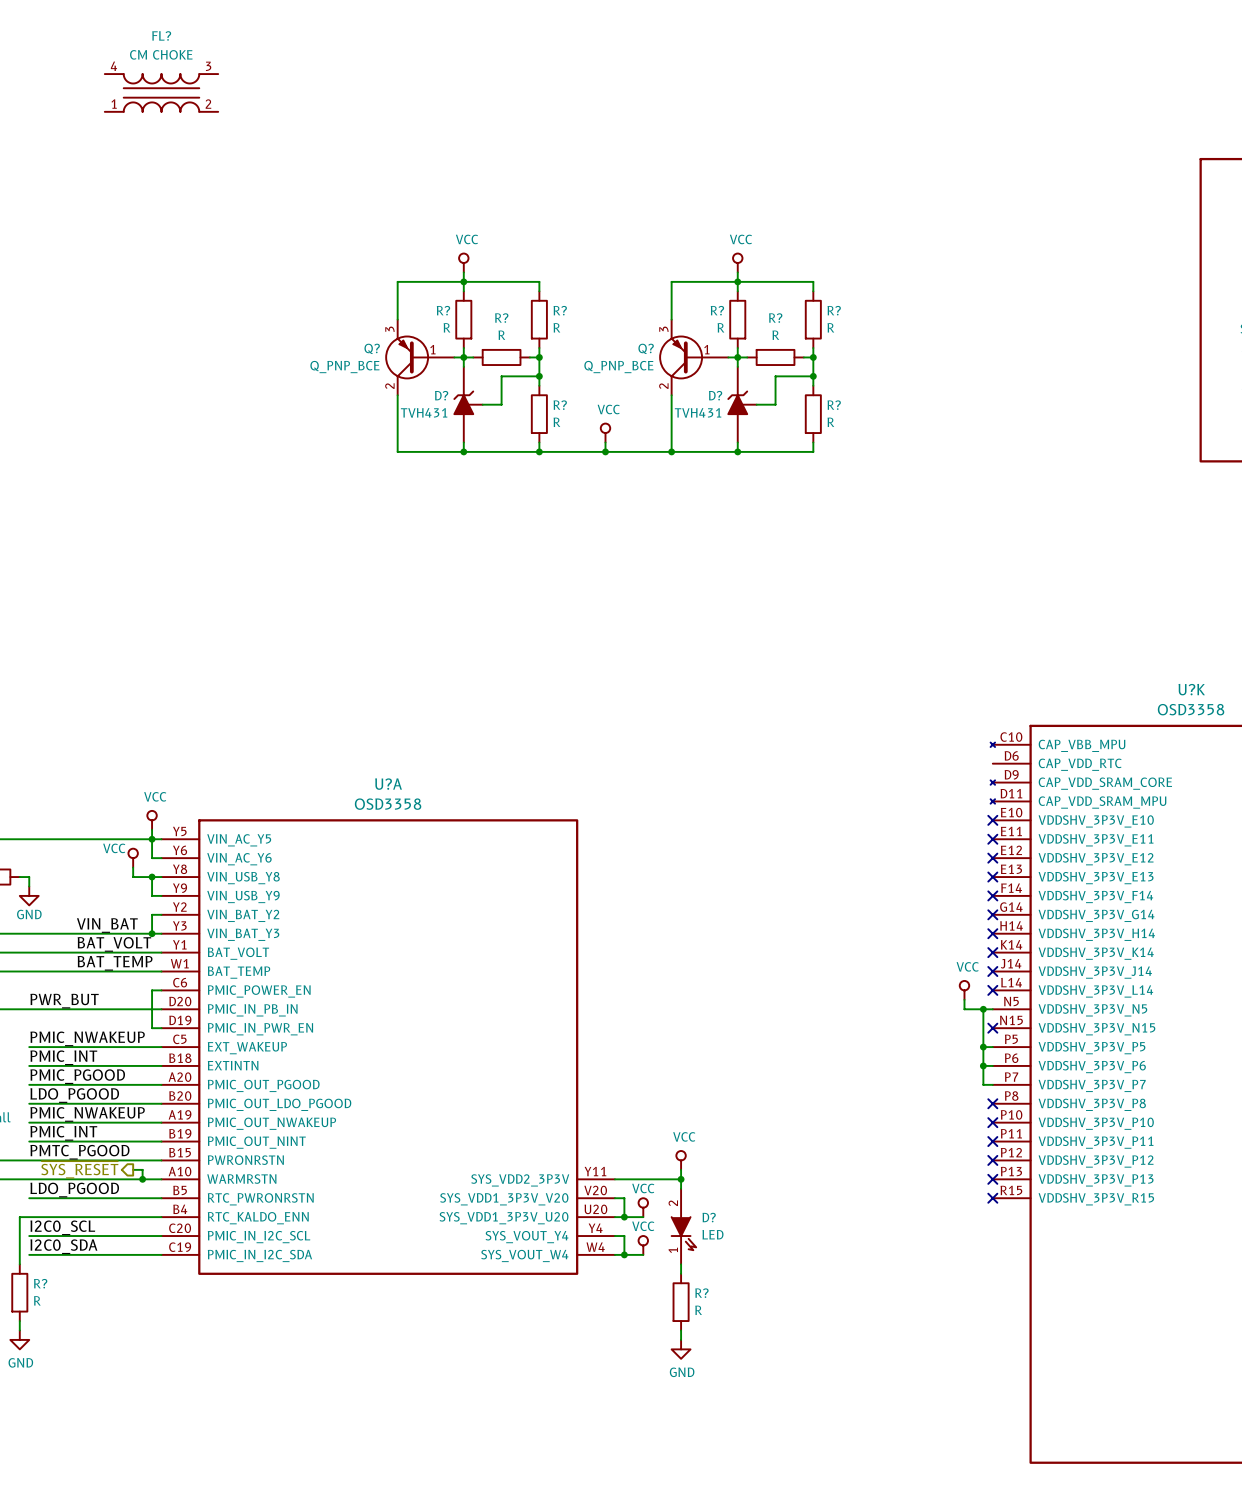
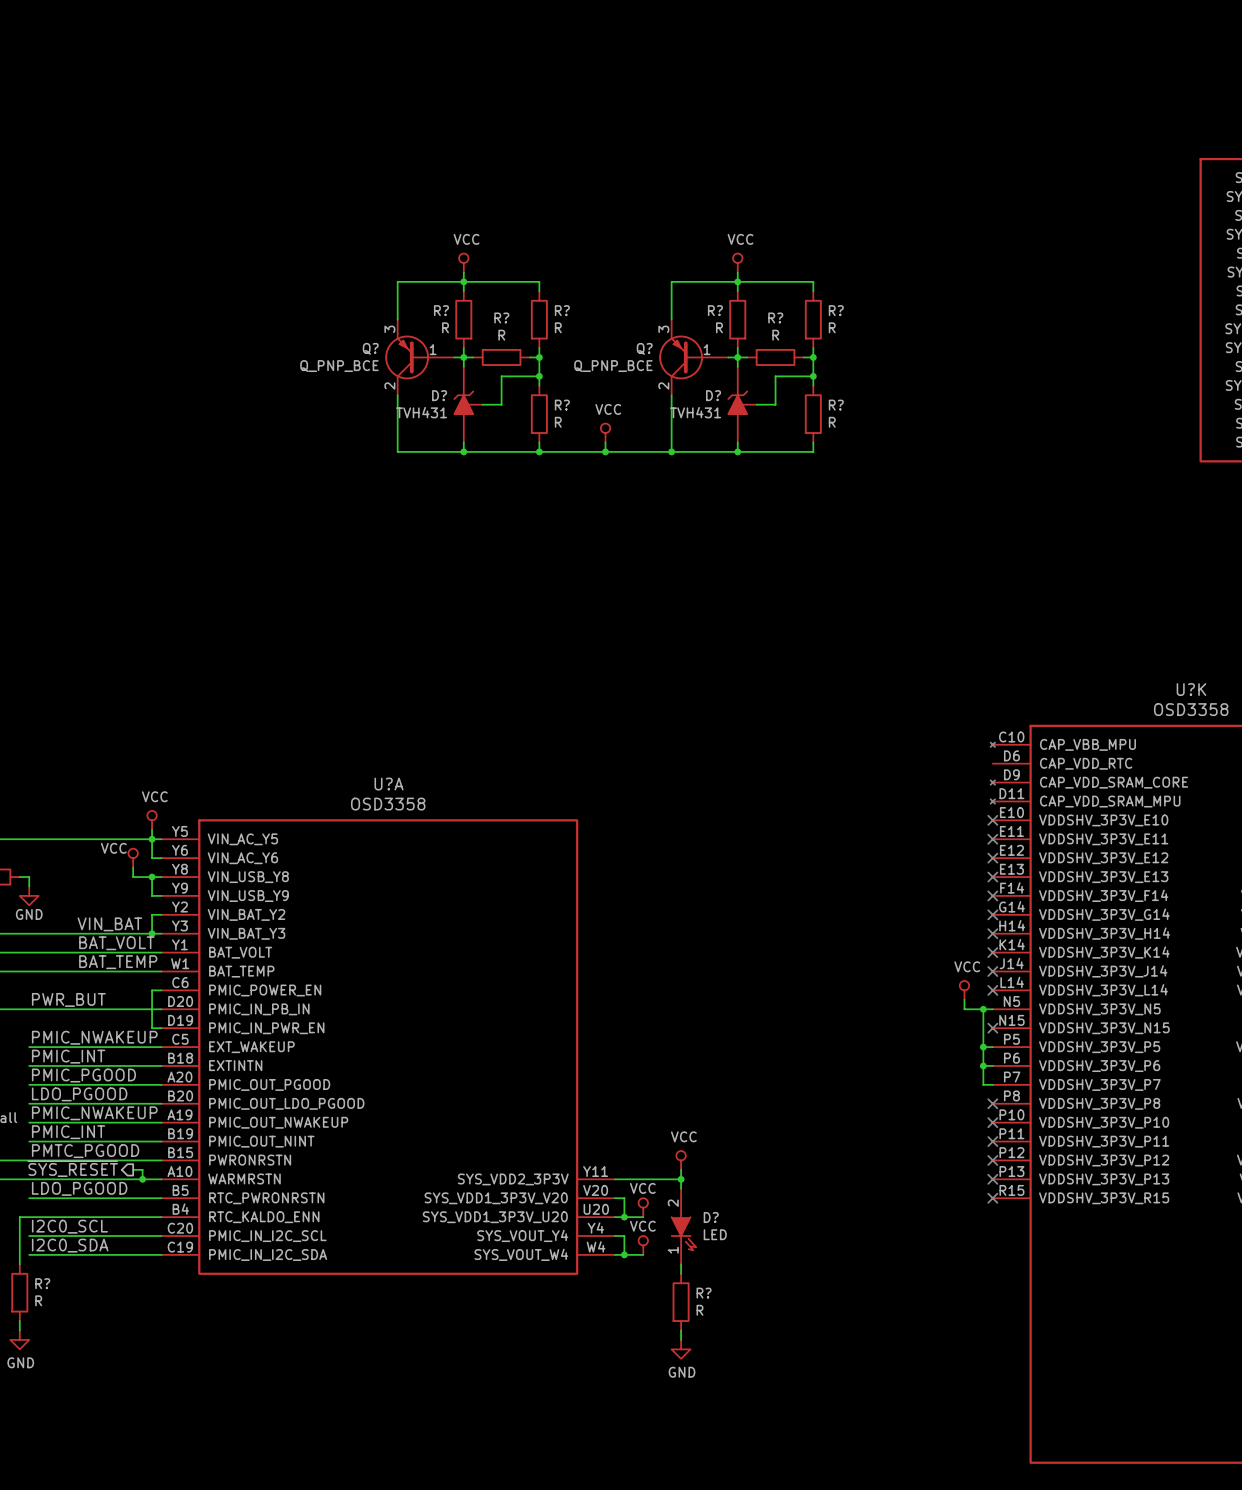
FL?: CM CHOKE (161, 92) -> none

